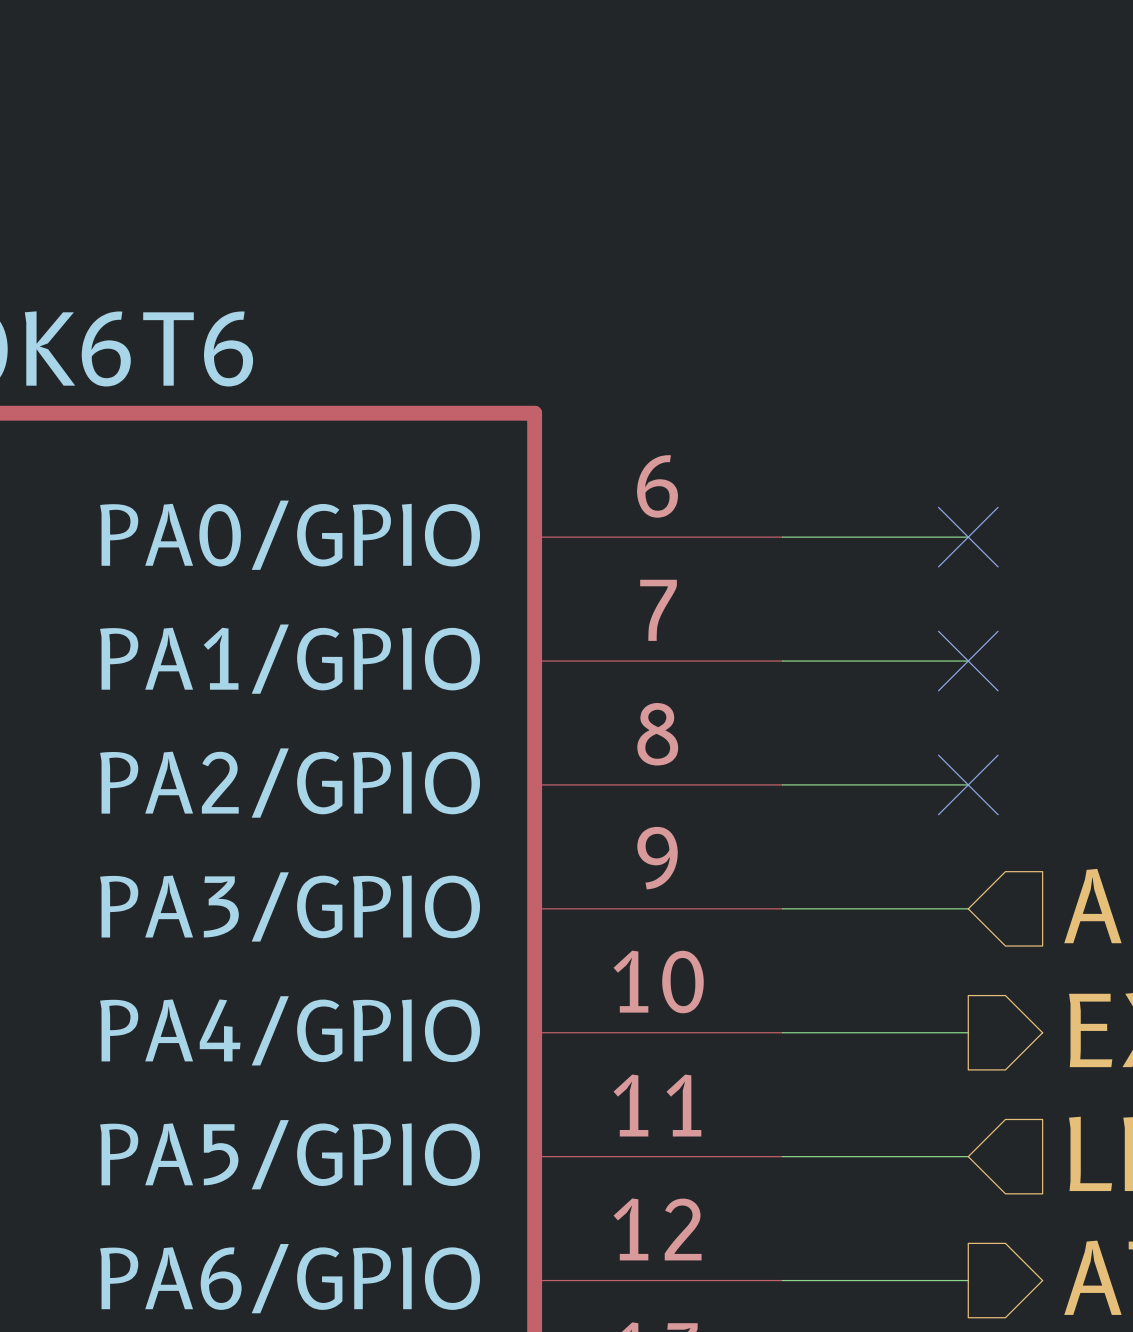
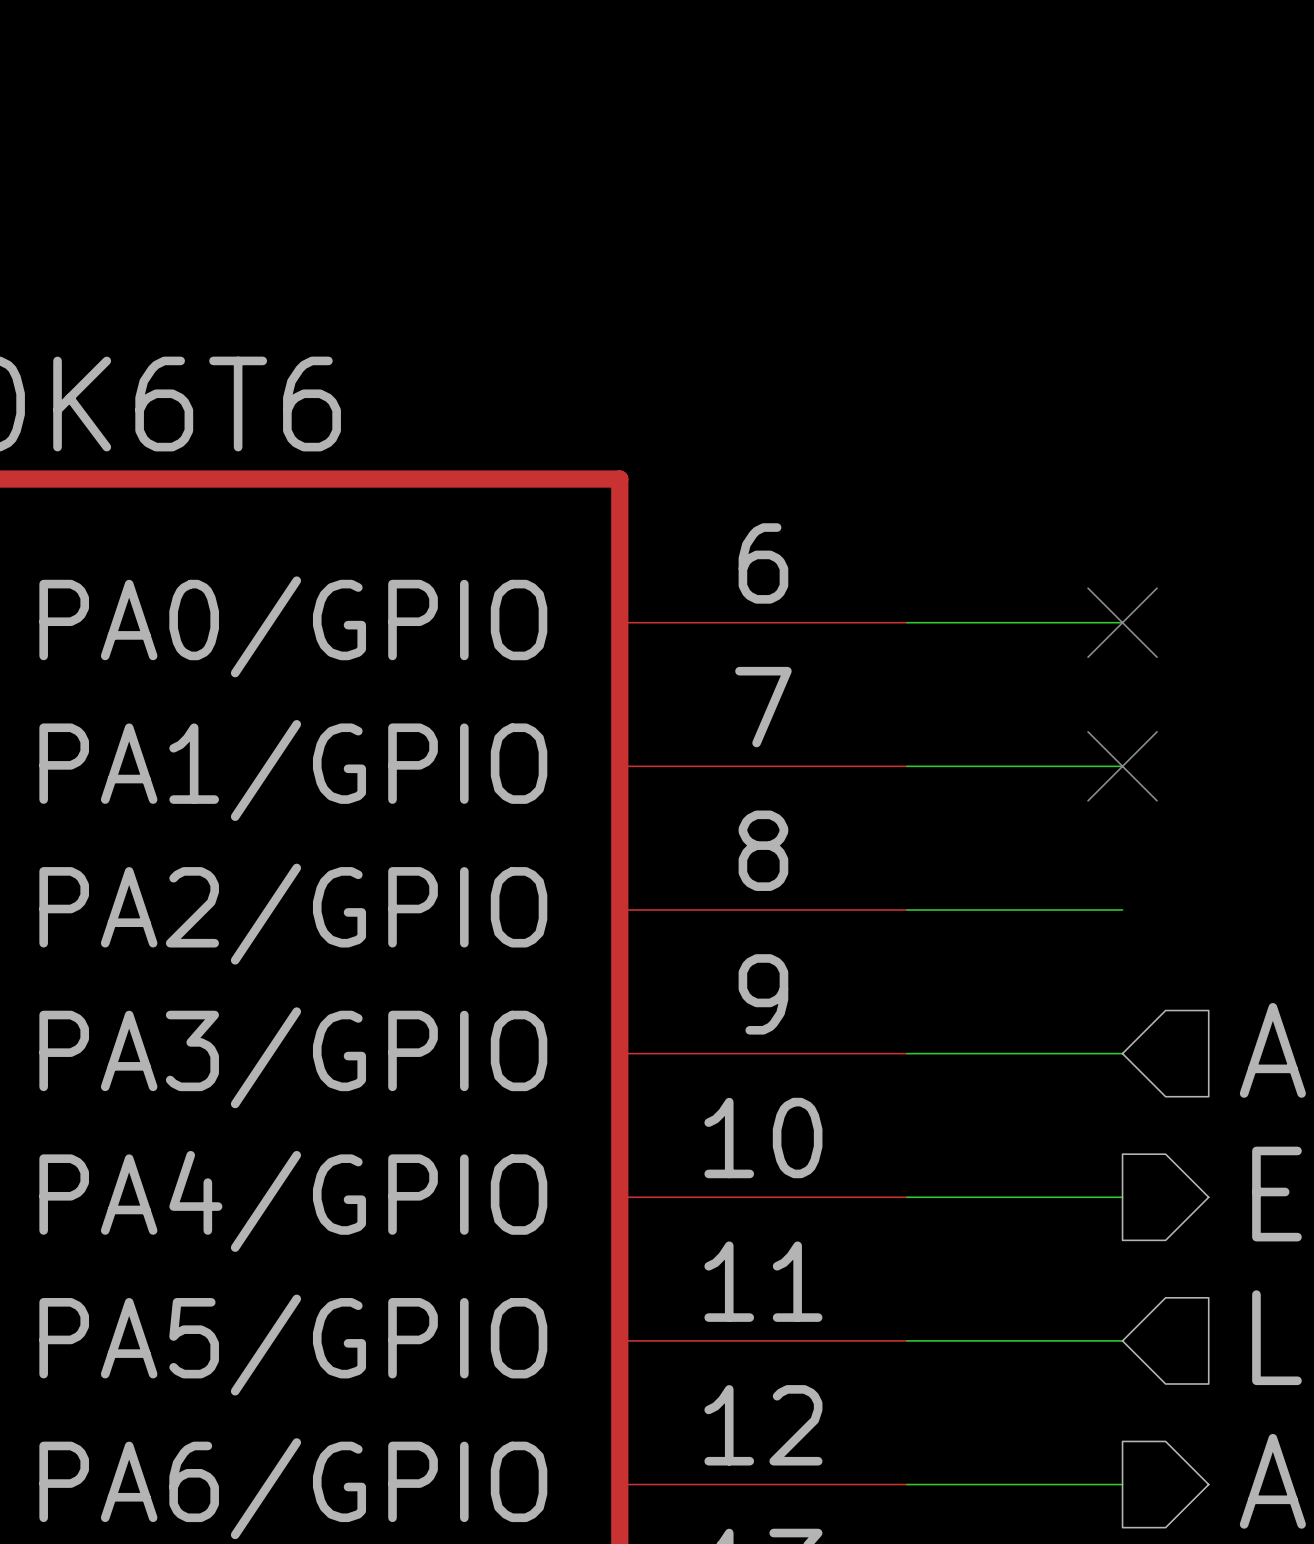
no-connect mark: (968, 784) -> none

